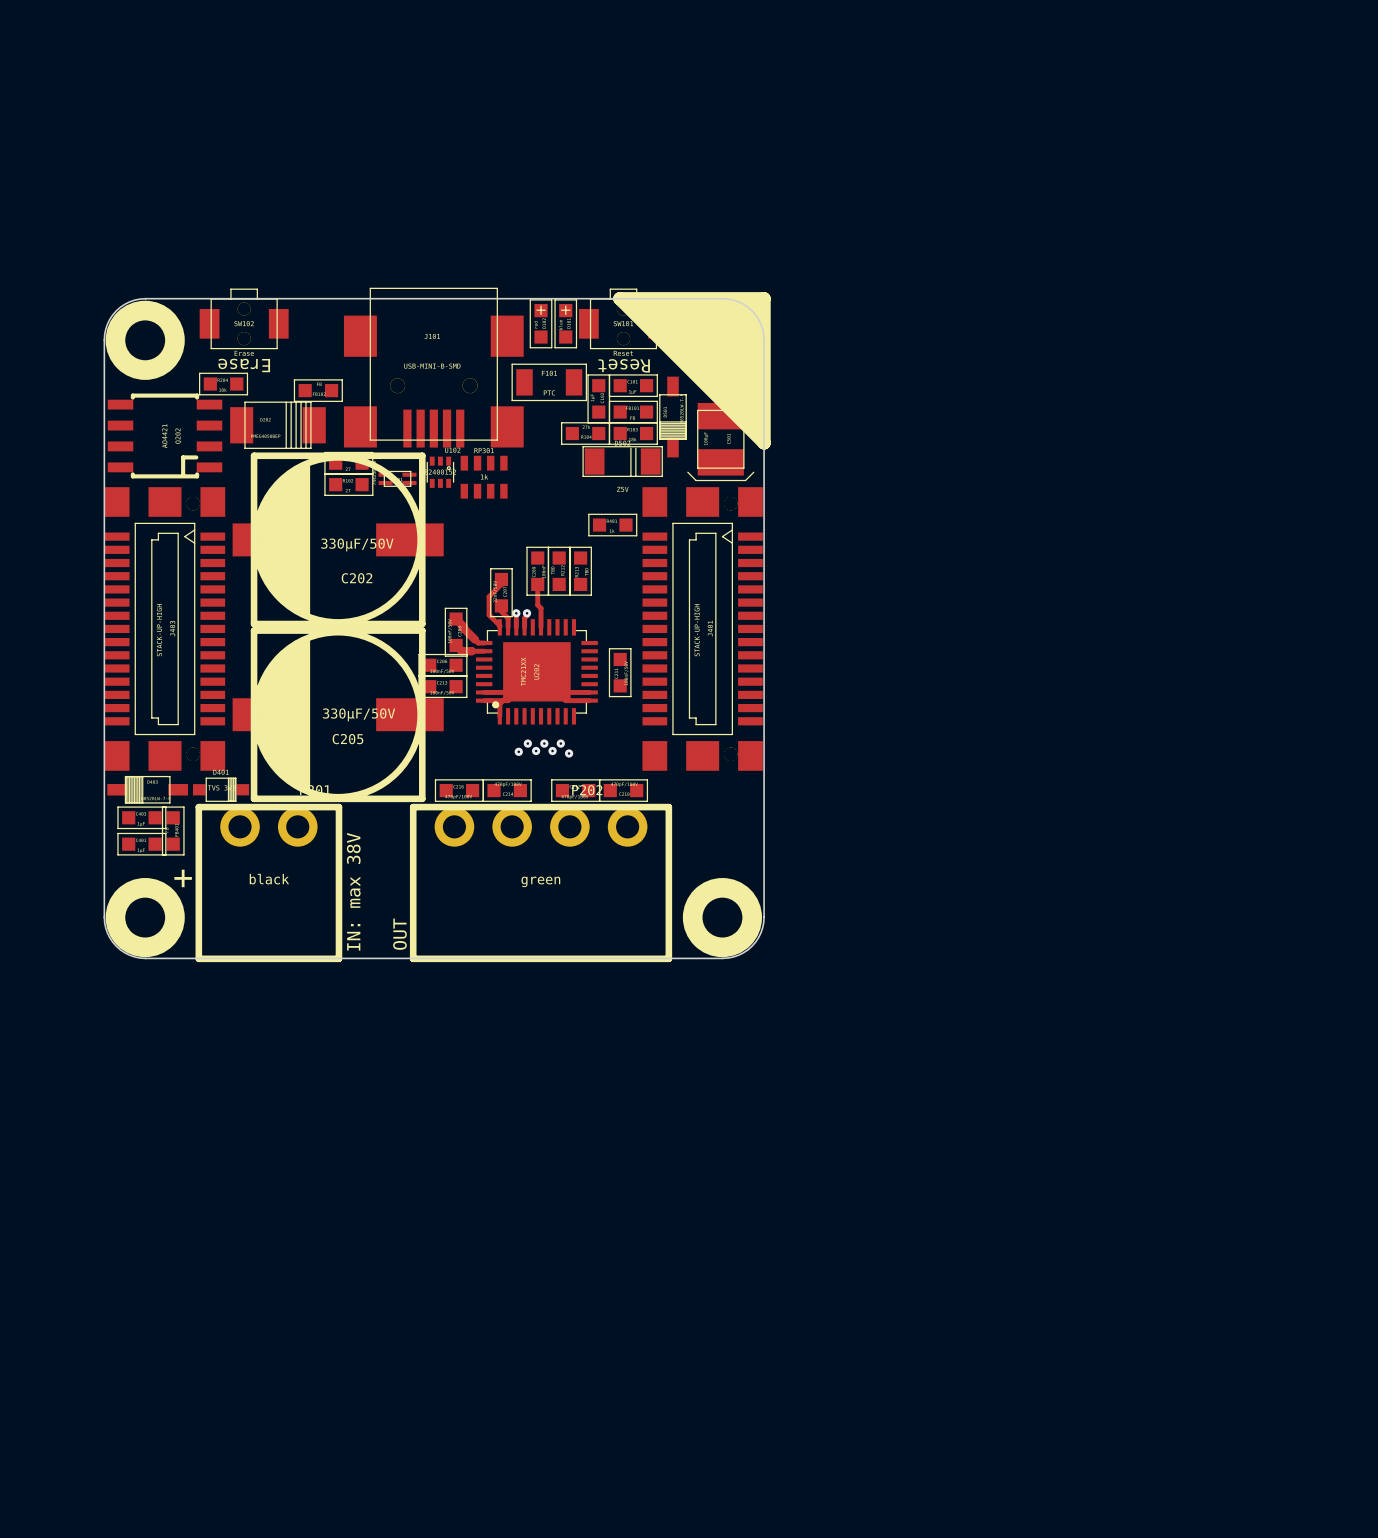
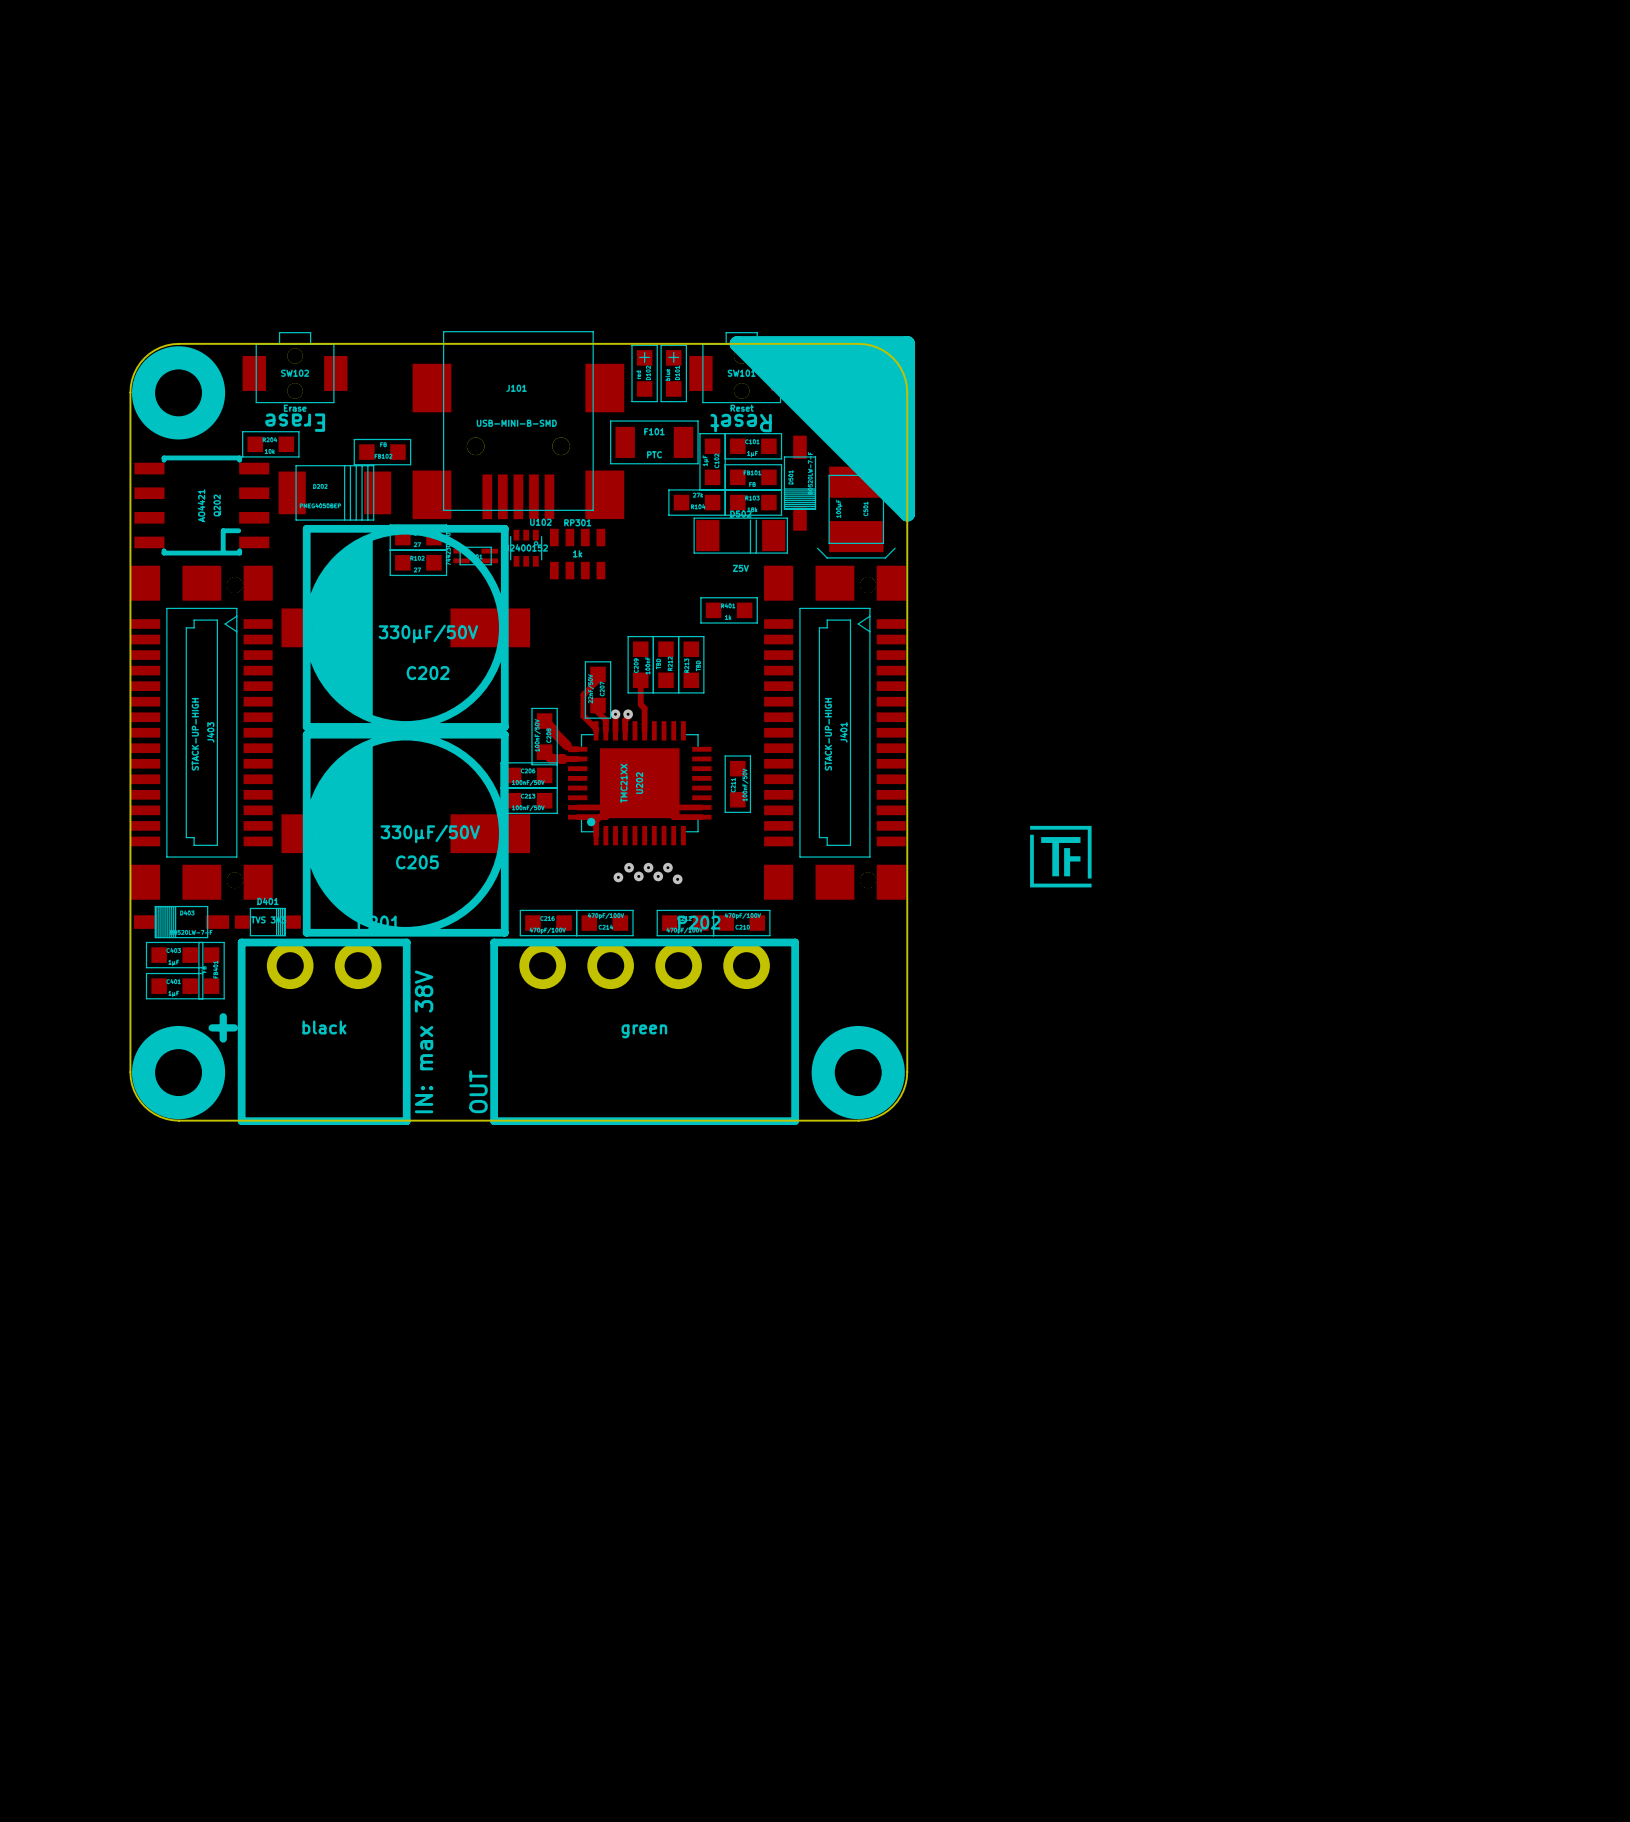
drawing: none -> [1030, 825, 1092, 888]

